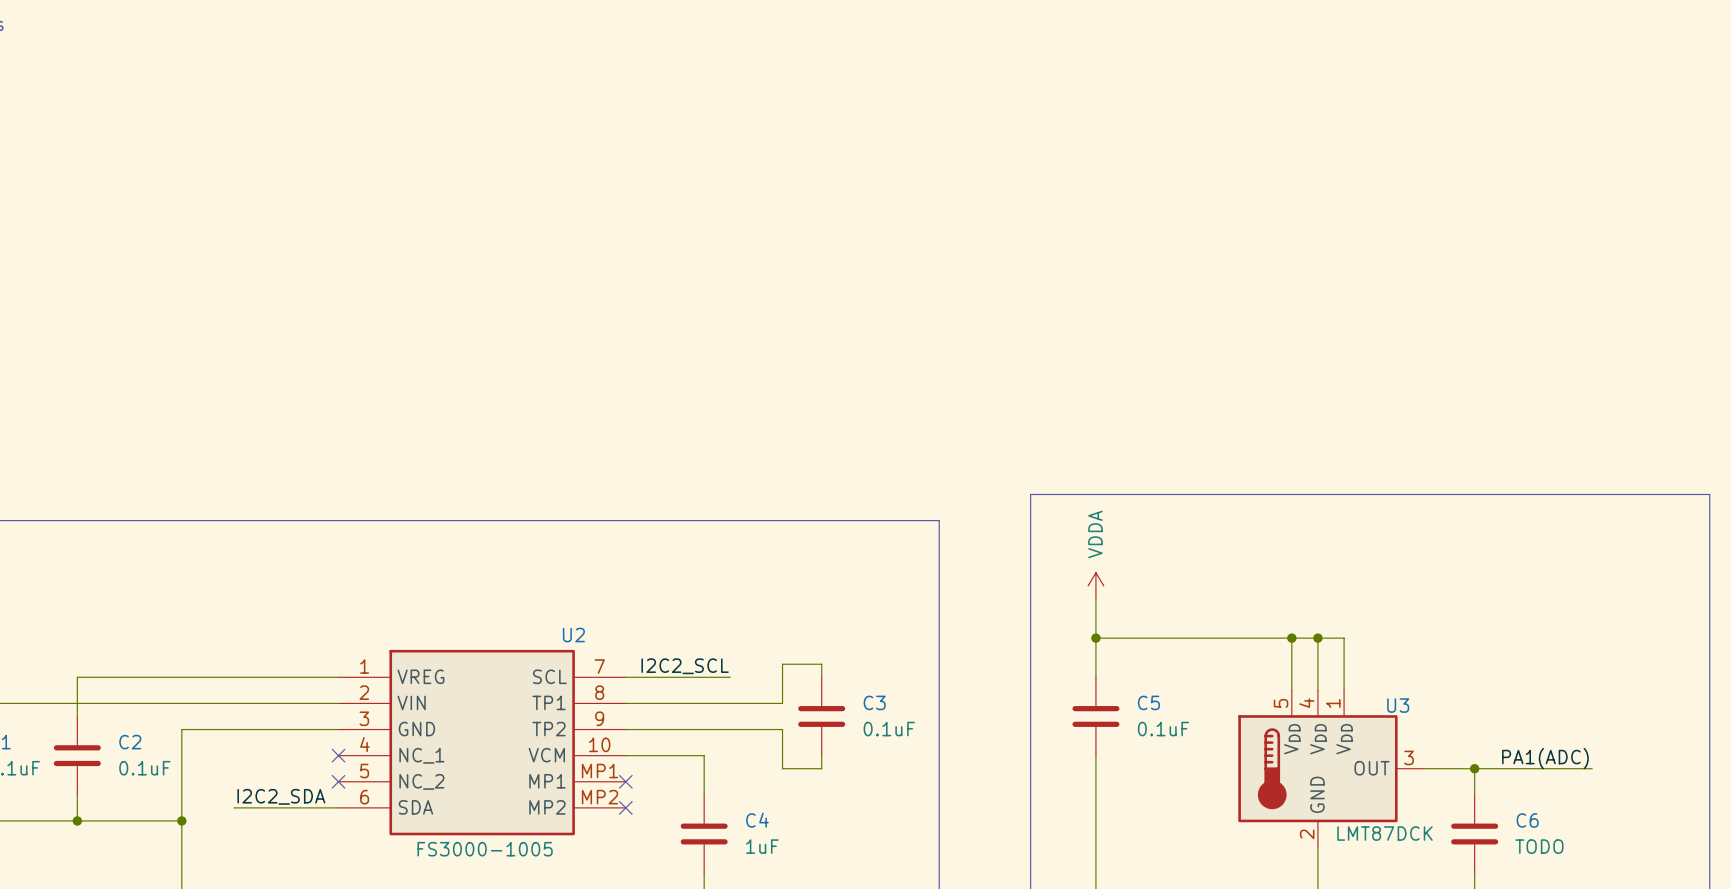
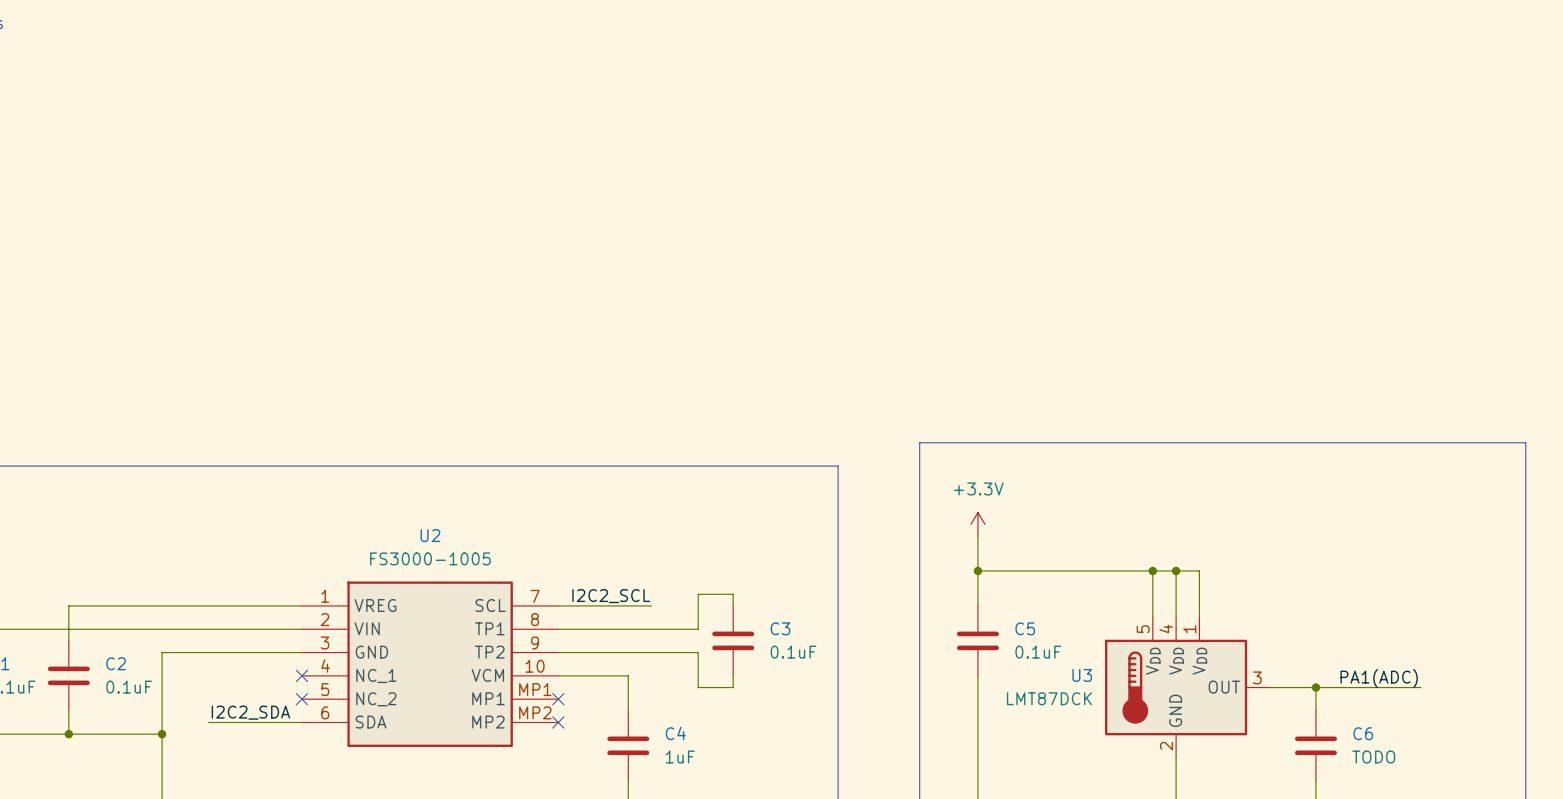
power symbol: VDDA (1095, 585) -> +3.3V (977, 524)
U2 name position: U2 (573, 635) -> U2 (430, 535)
U3 name position: U3 (1398, 705) -> U3 (1082, 675)
U3 value position: LMT87DCK (1385, 833) -> LMT87DCK (1049, 698)
U2 value position: FS3000-1005 (485, 849) -> FS3000-1005 (430, 558)

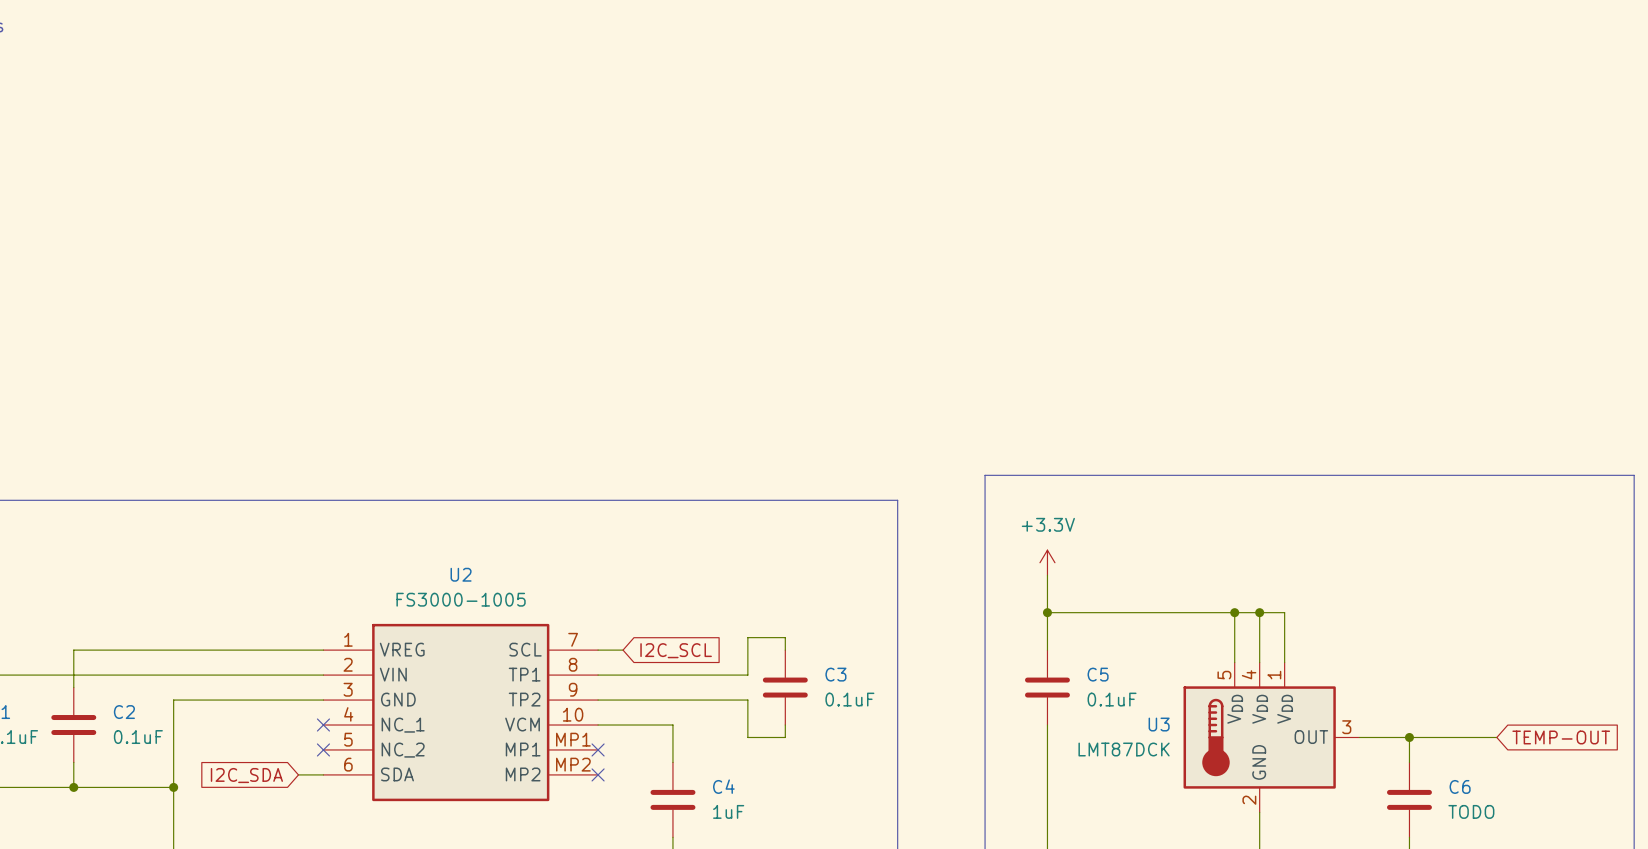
label: I2C2_SCL (611, 596) -> none
wire: (581, 605) (651, 605) -> none
global label: none -> I2C_SCL (676, 650)
label: PA1(ADC) (1379, 678) -> none
wire: (1397, 687) (1420, 687) -> none
global label: none -> TEMP-OUT (1561, 737)
label: I2C2_SDA (250, 712) -> none
wire: (208, 722) (278, 722) -> none
global label: none -> I2C_SDA (246, 775)

